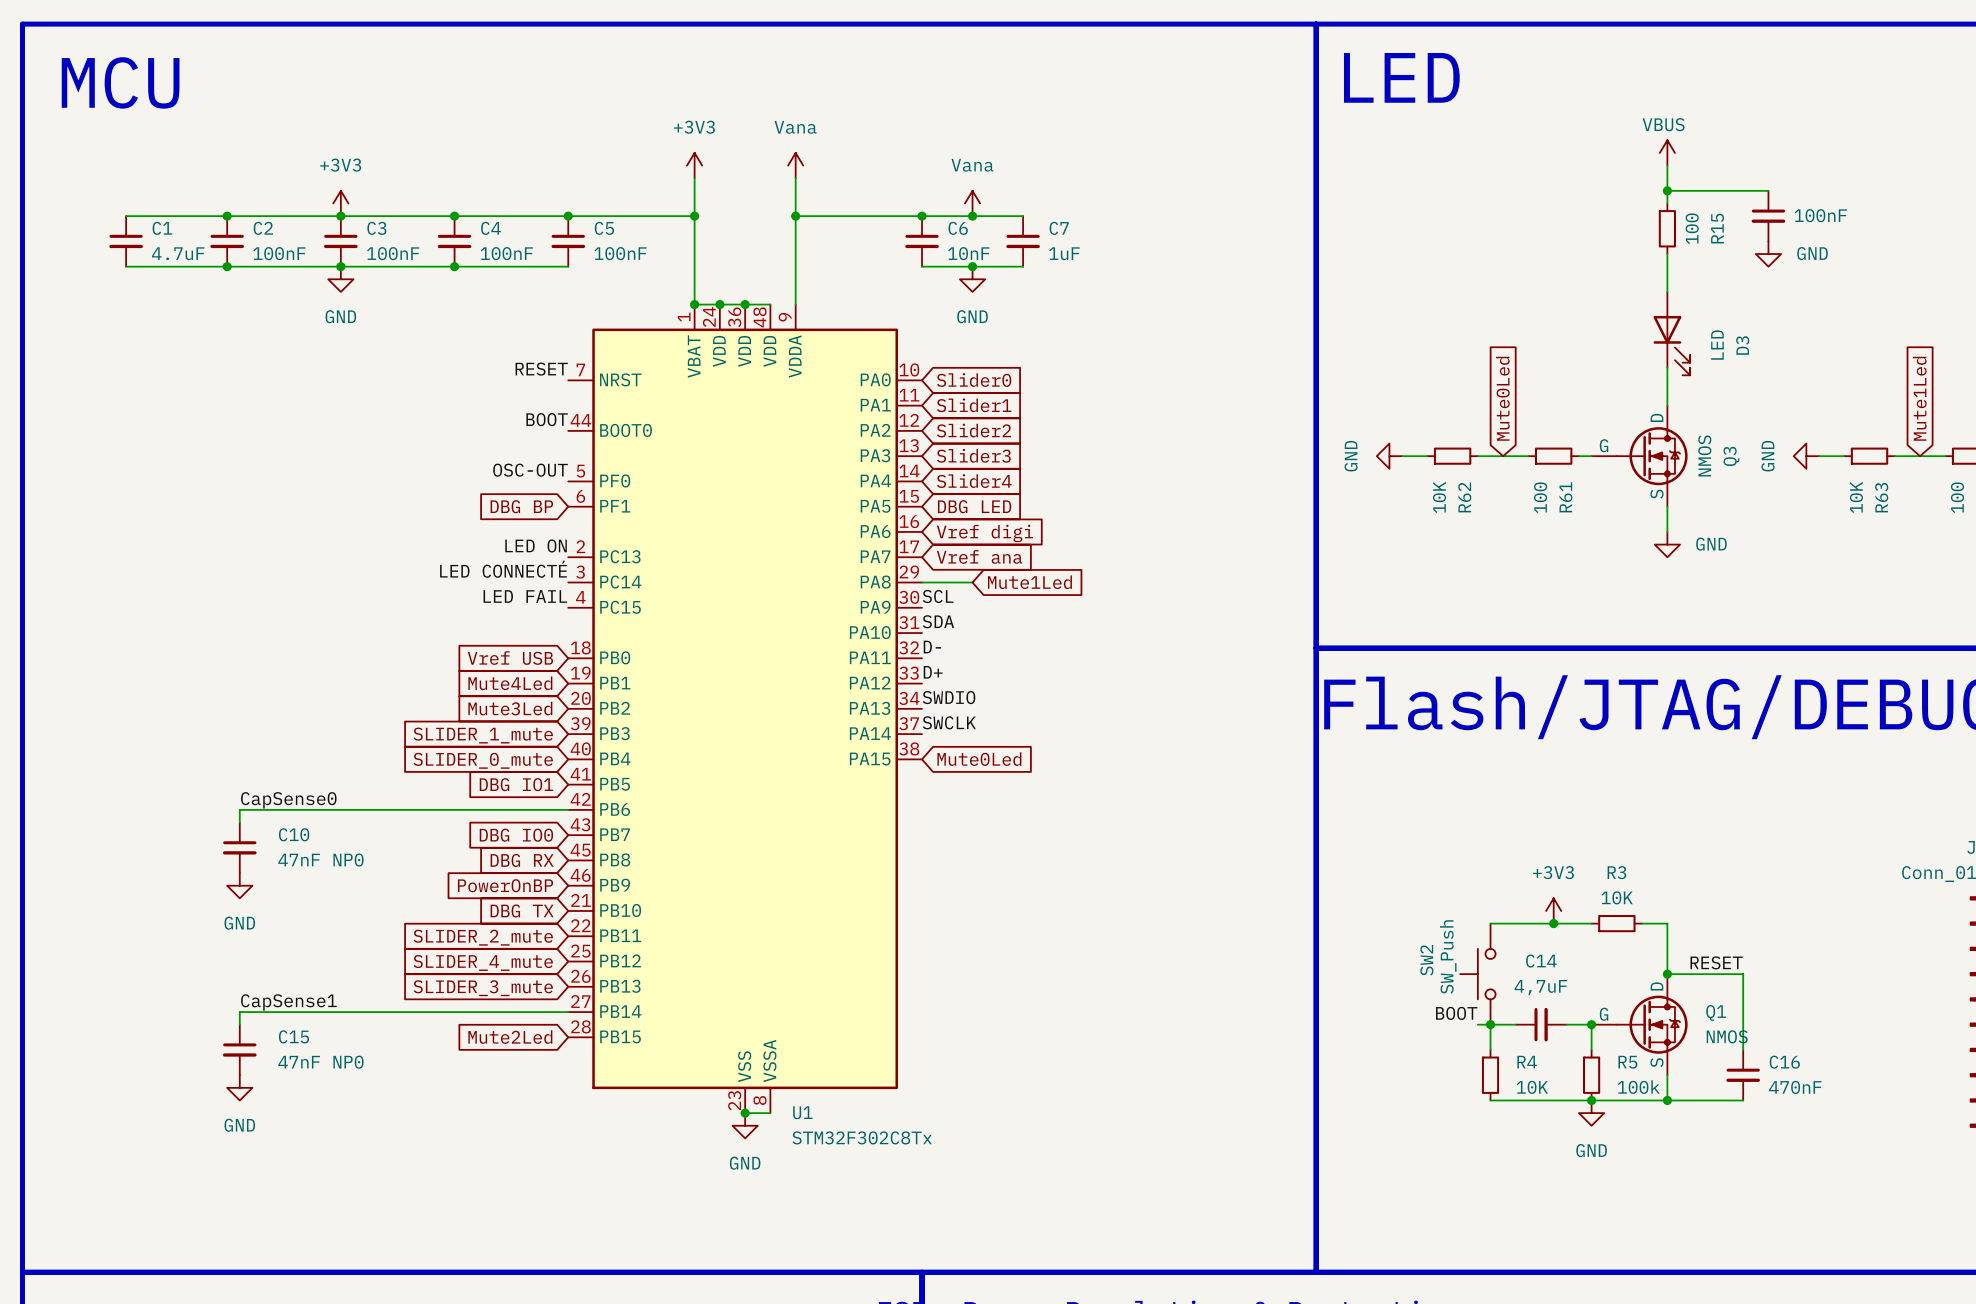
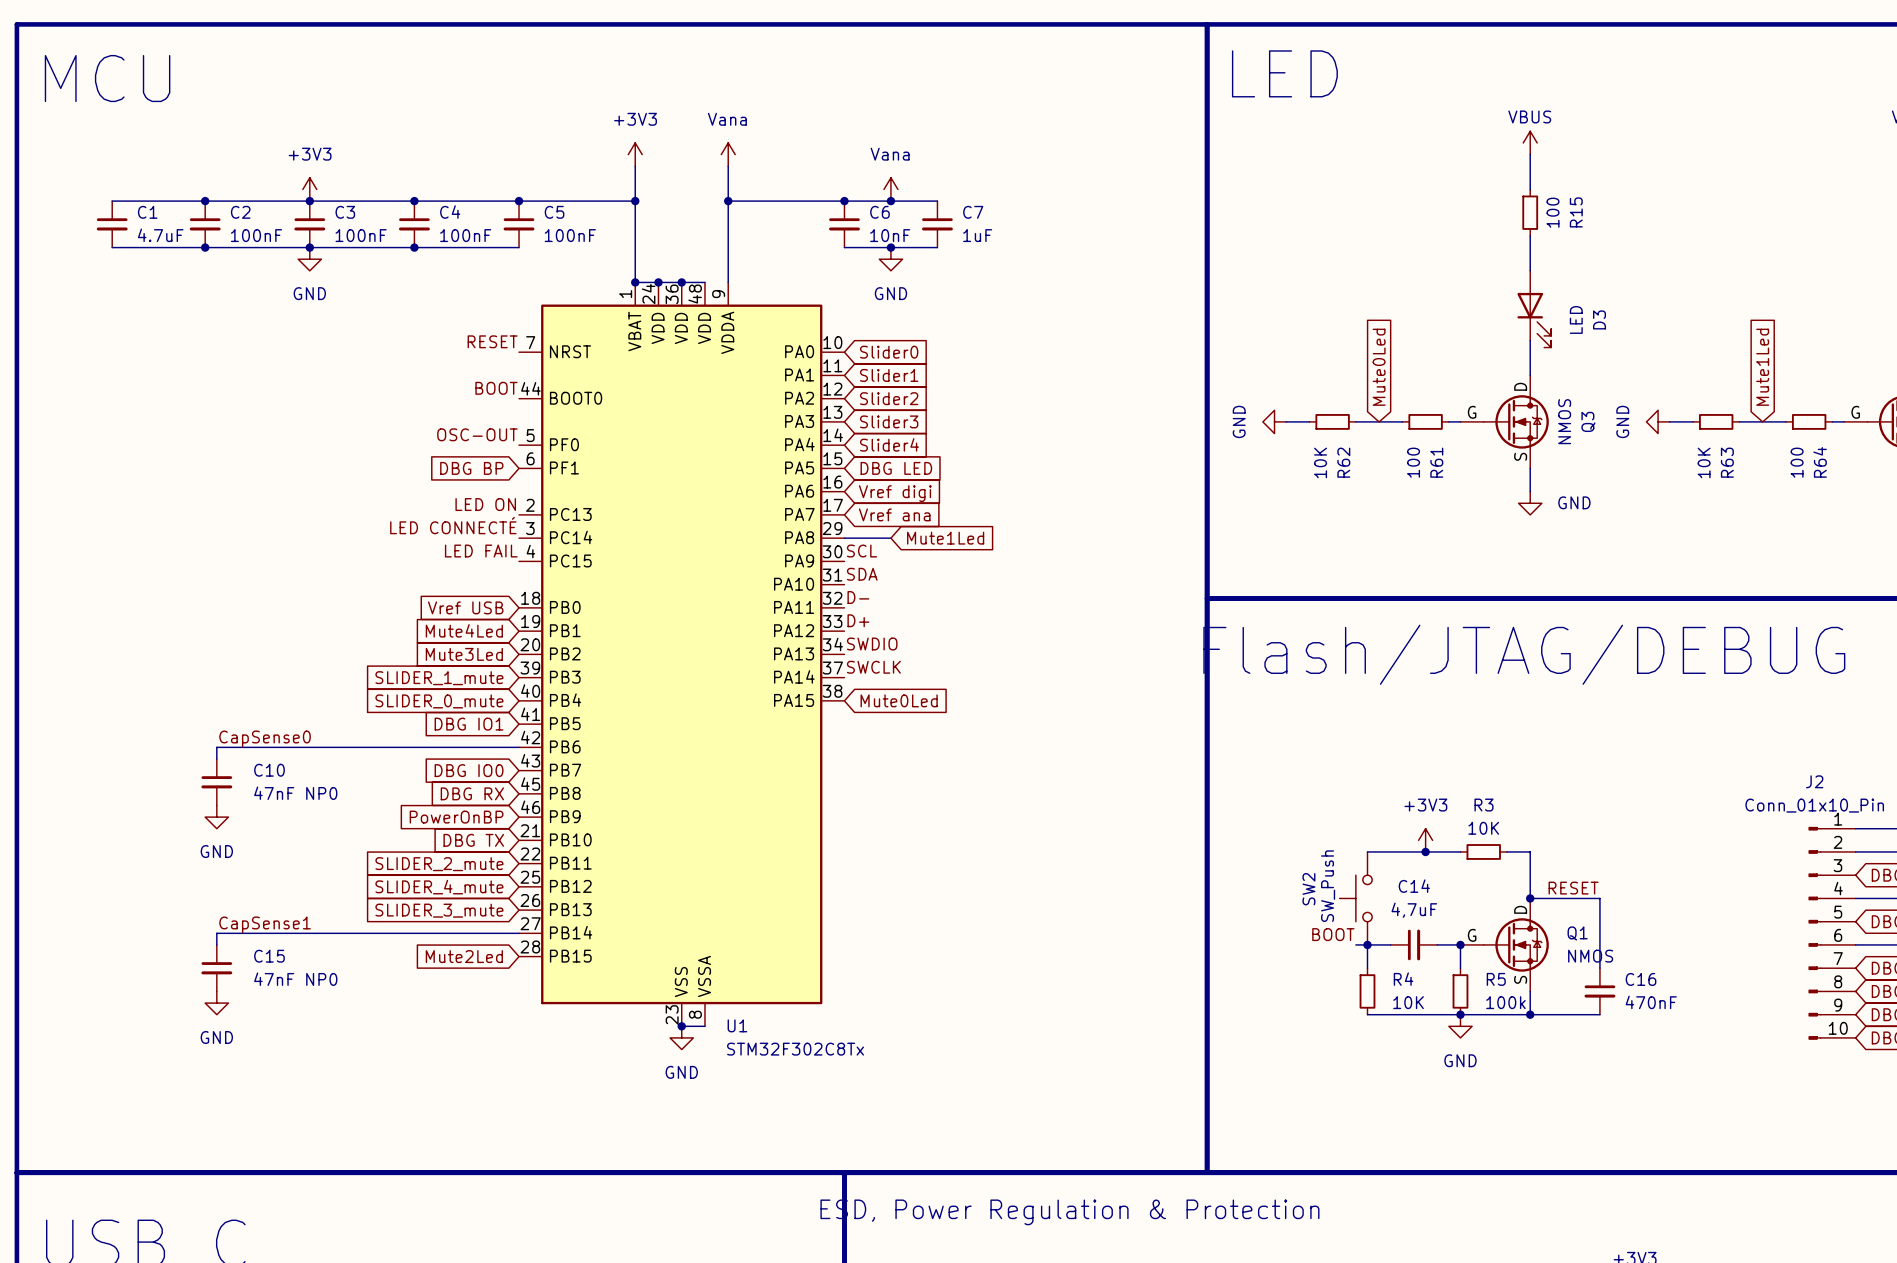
wire: (1667, 190) (1768, 190) -> none
junction: (1667, 190) -> none
part: 100nF (1768, 216) -> none
power symbol: GND (1768, 254) -> none

